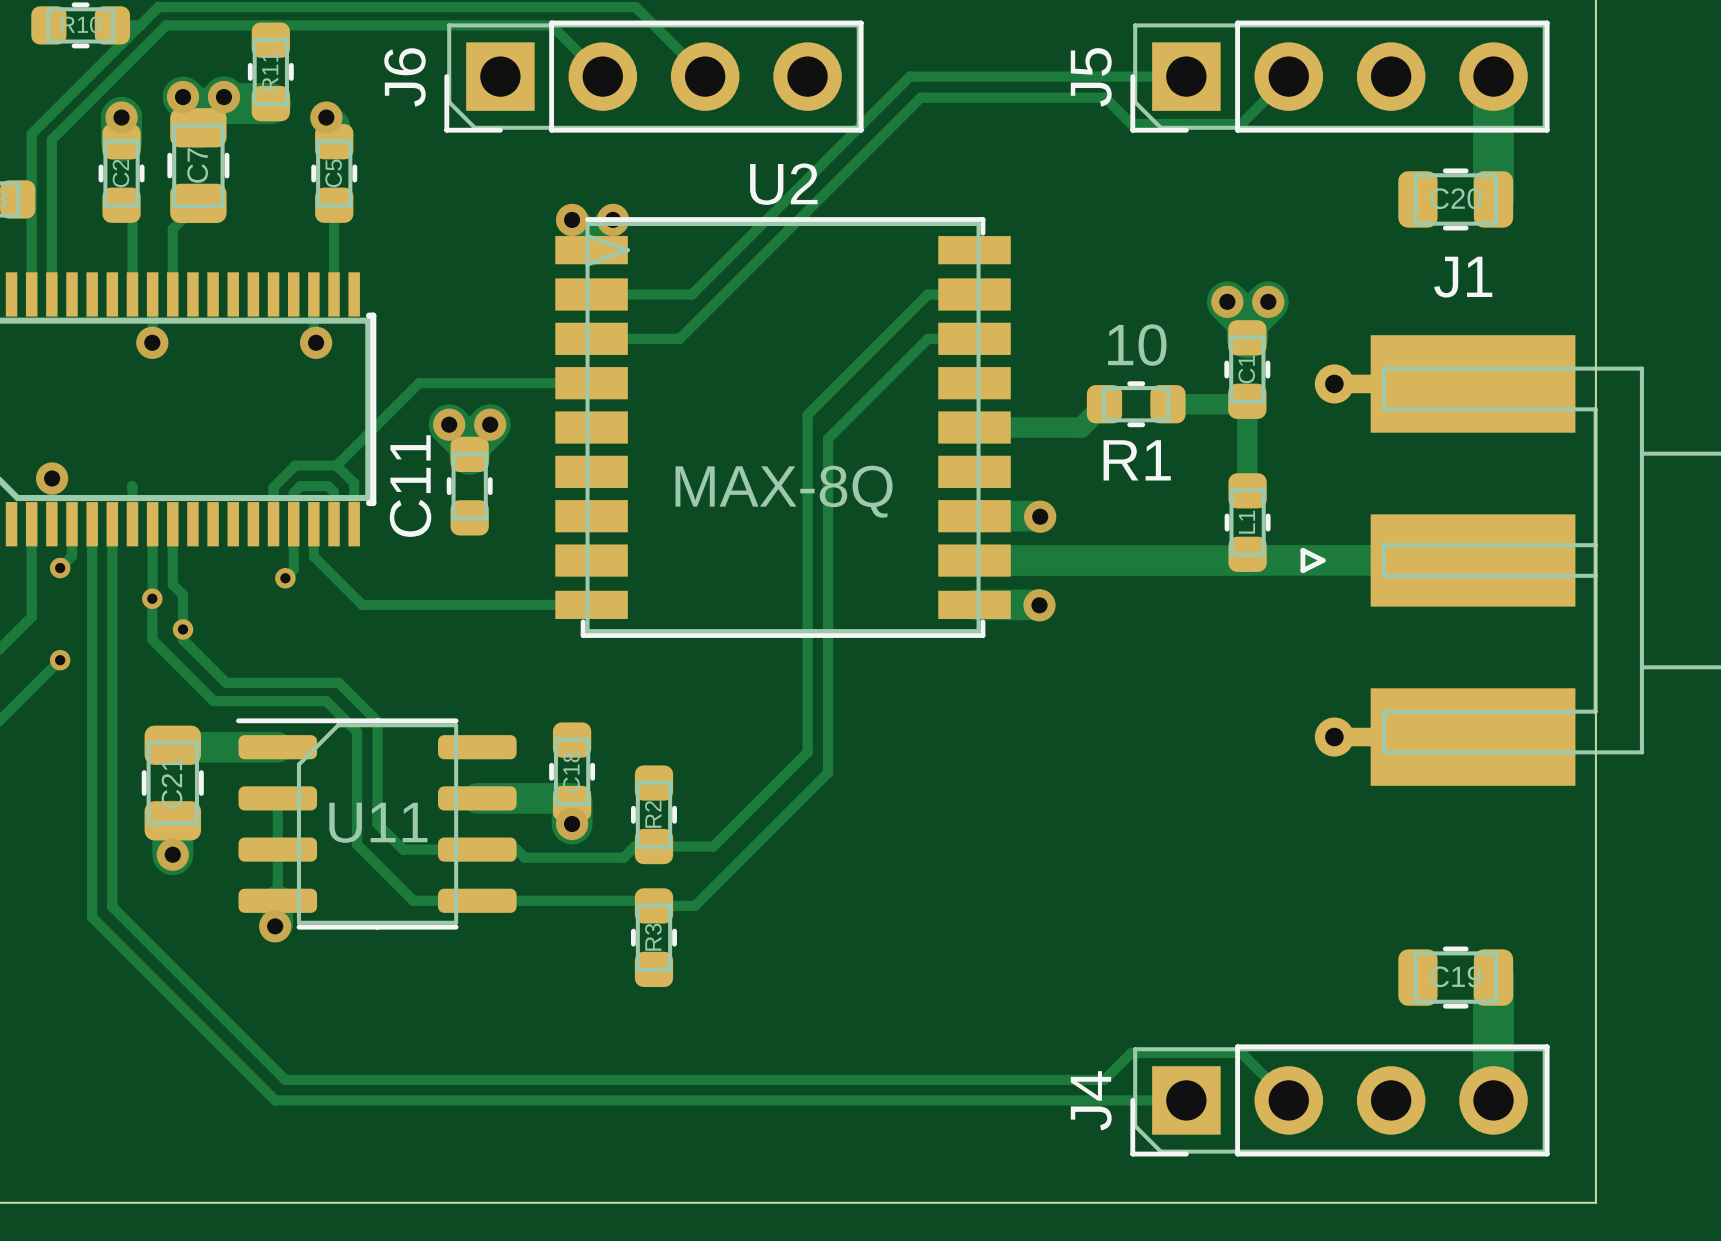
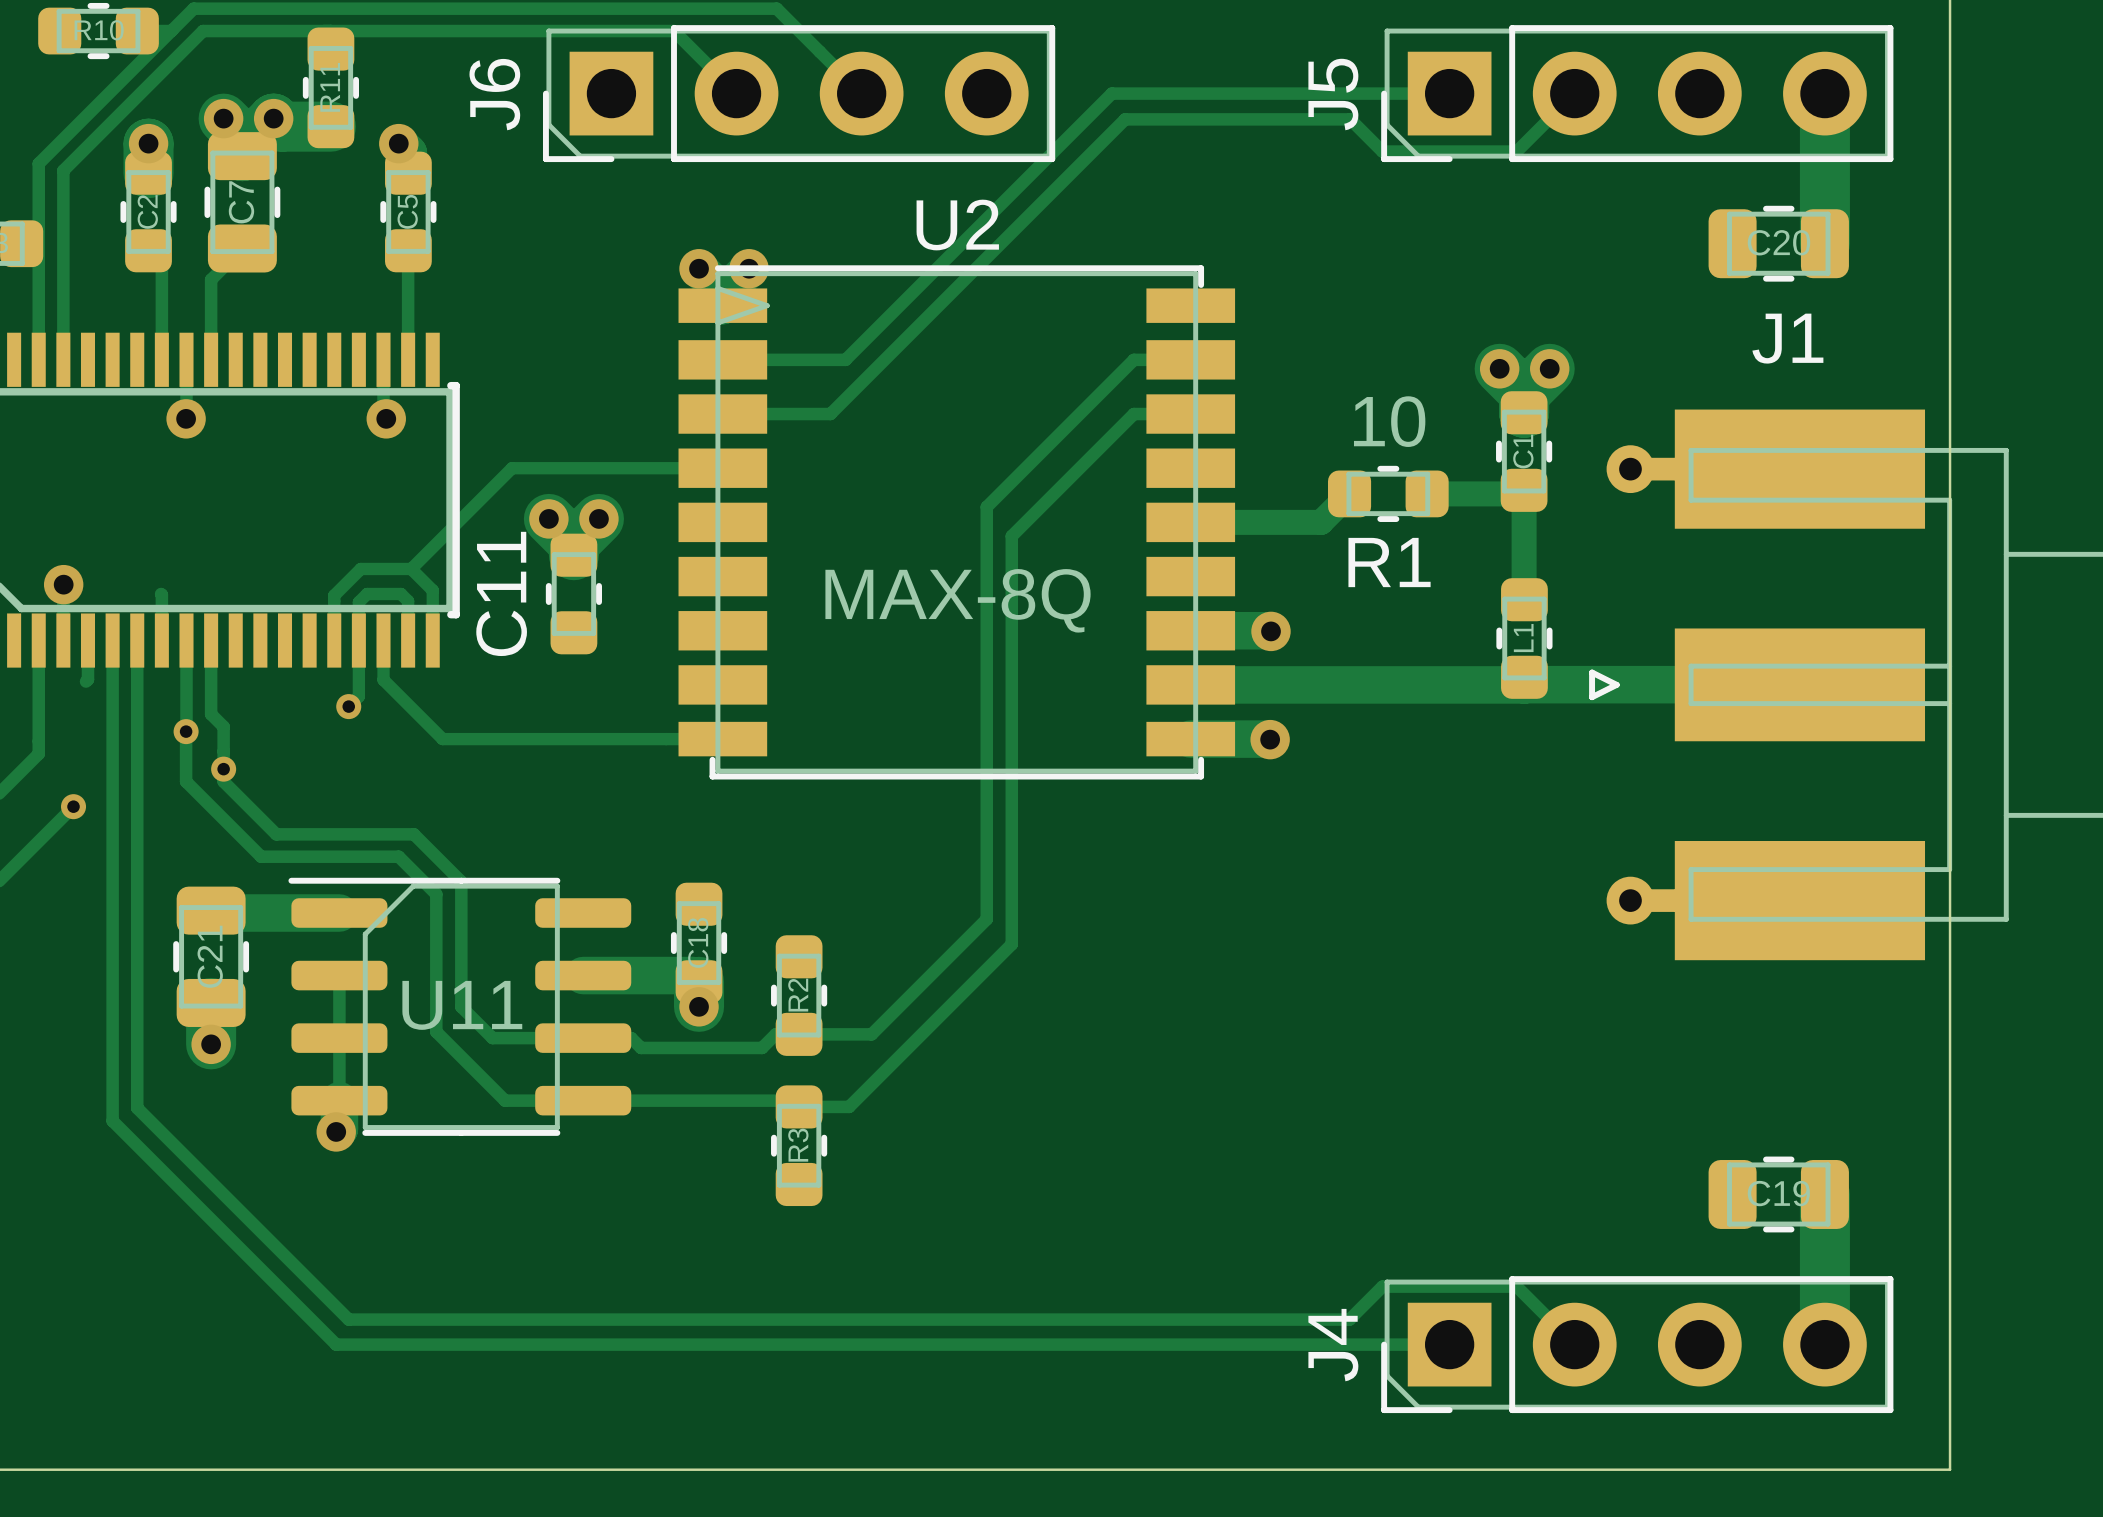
via: (60, 568) -> none

